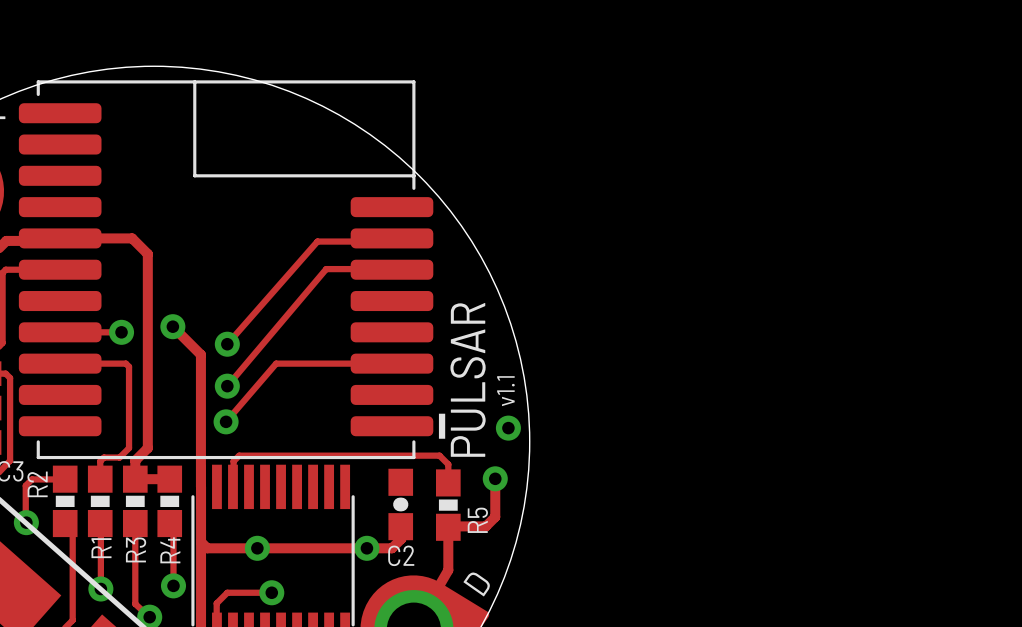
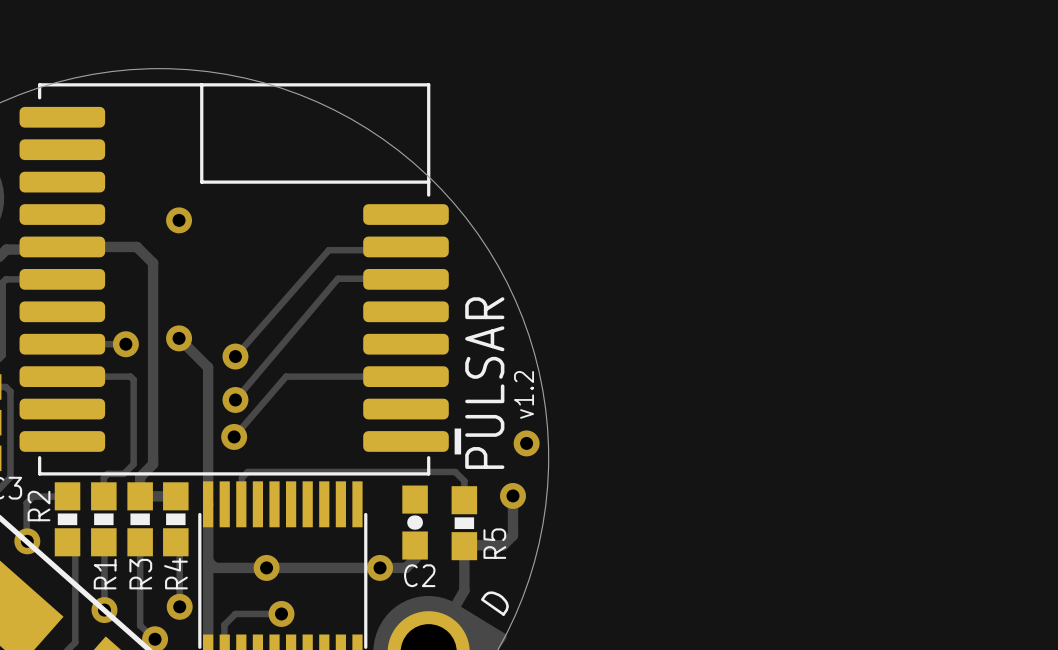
via: none -> (179, 220)
text: v1.1 (505, 391) -> v1.2 (524, 394)

